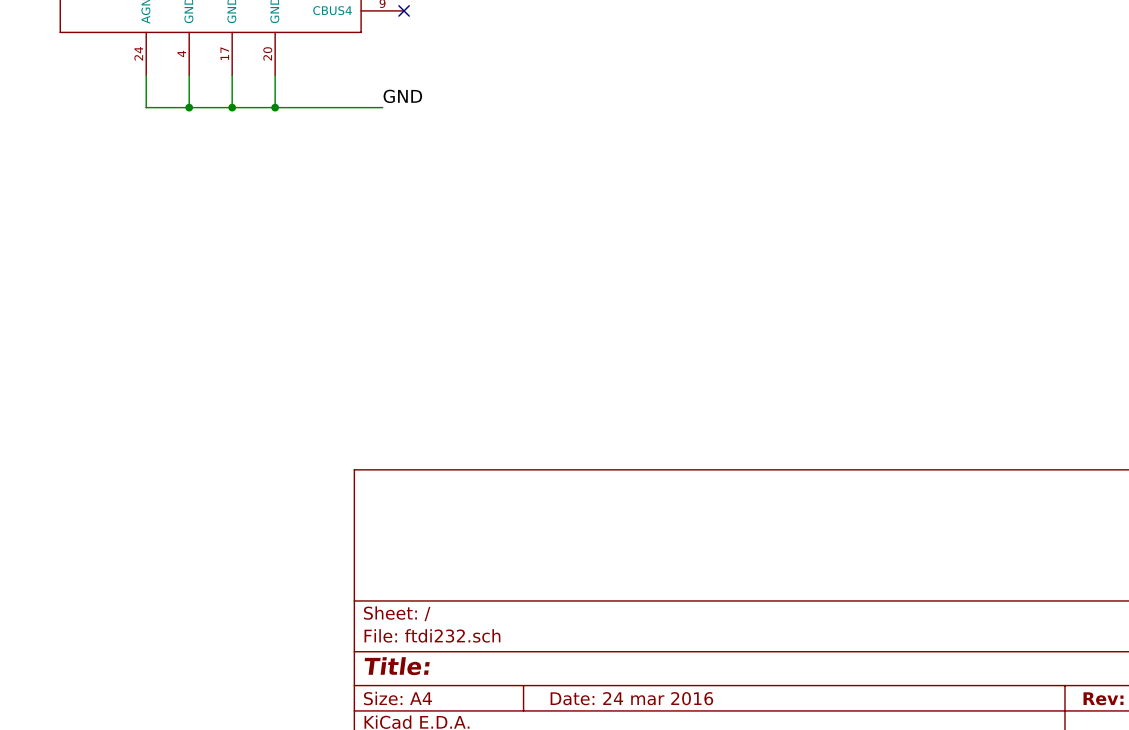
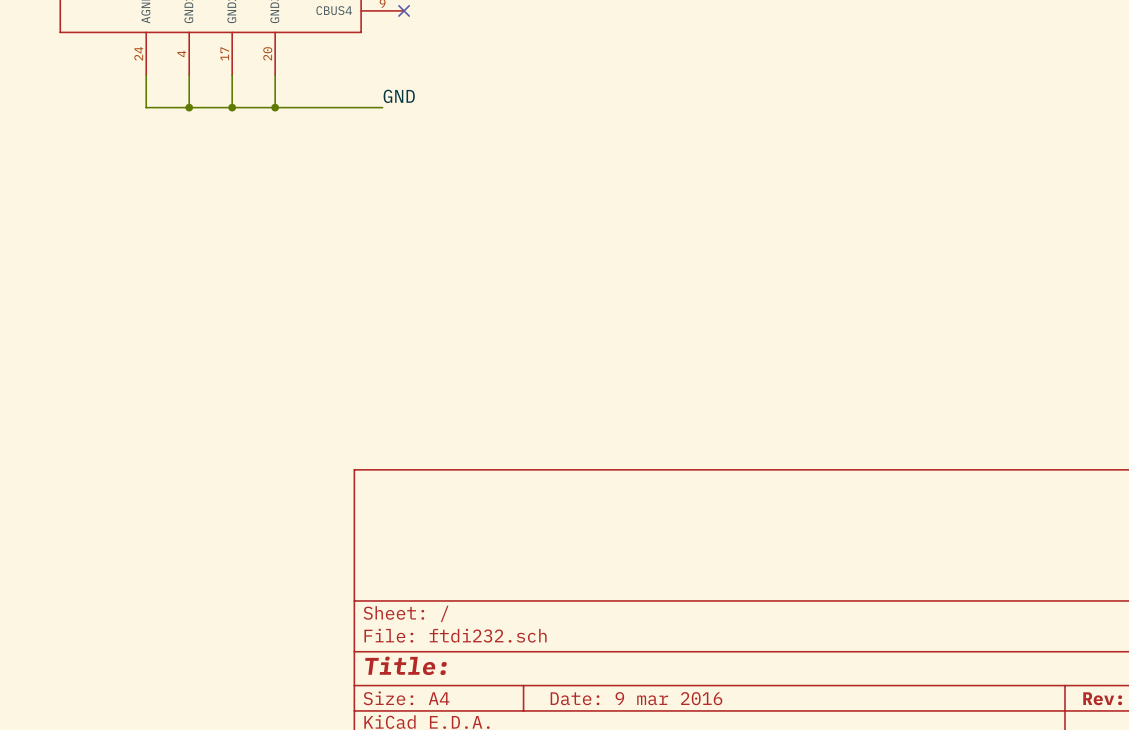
title block: Date: 24 mar 2016 (631, 698) -> Date: 9 mar 2016 (636, 698)

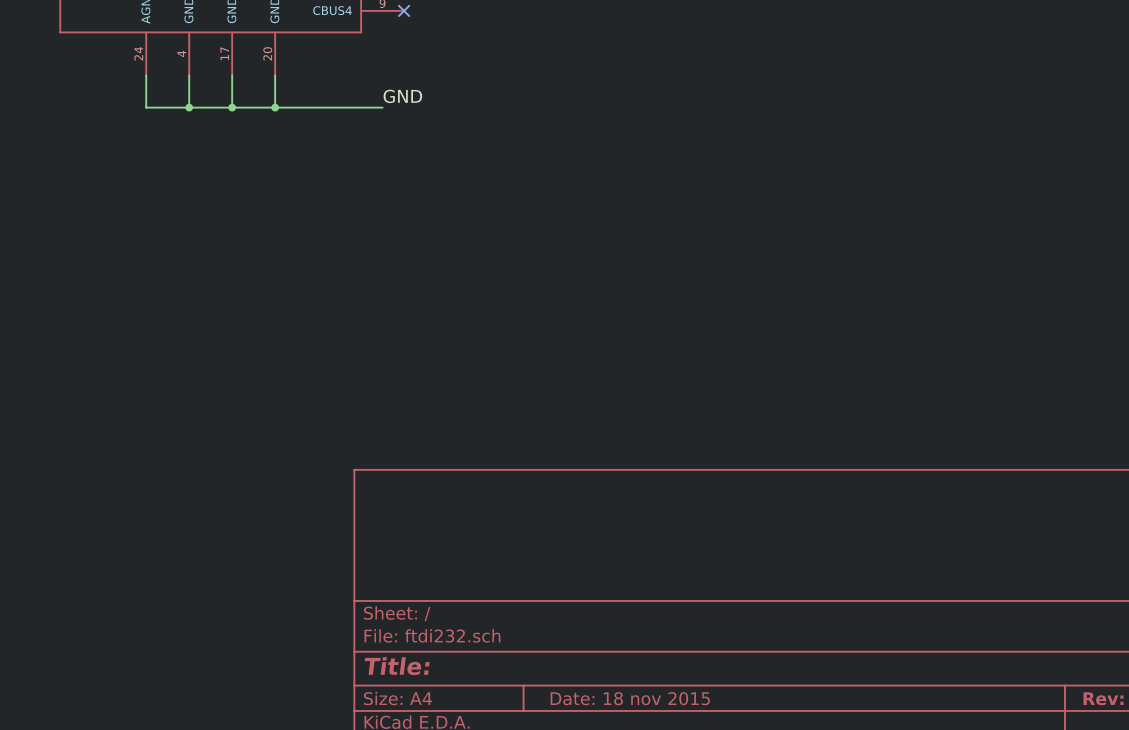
title block: Date: 9 mar 2016 (636, 698) -> Date: 18 nov 2015 (630, 698)

